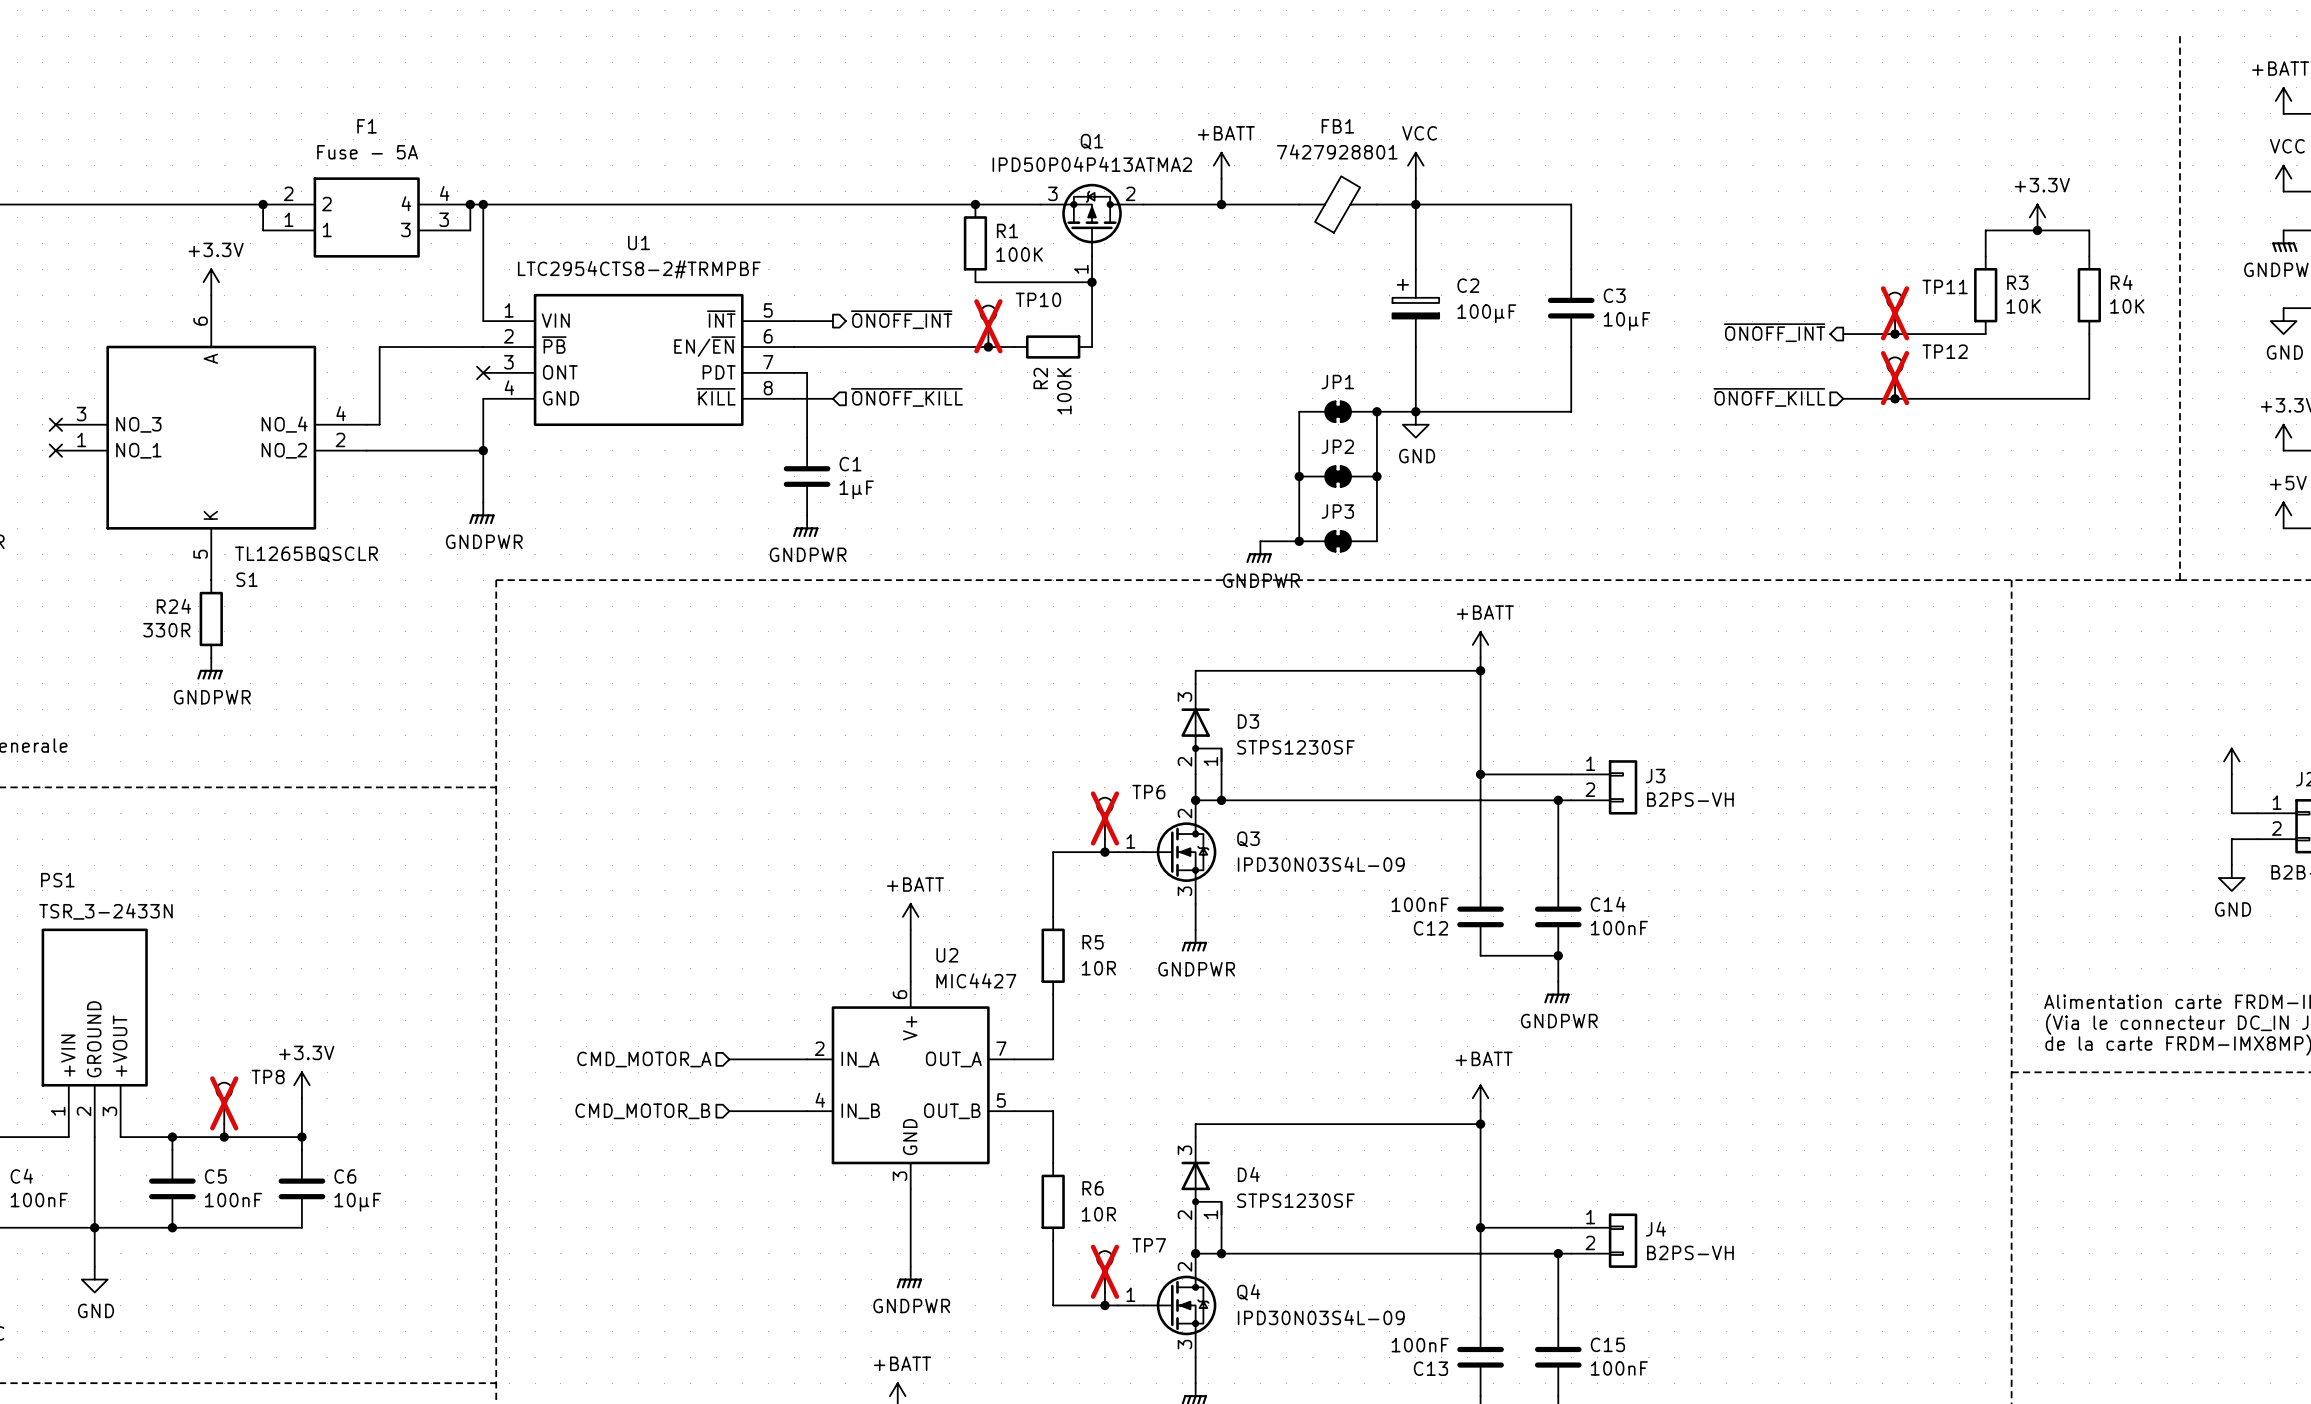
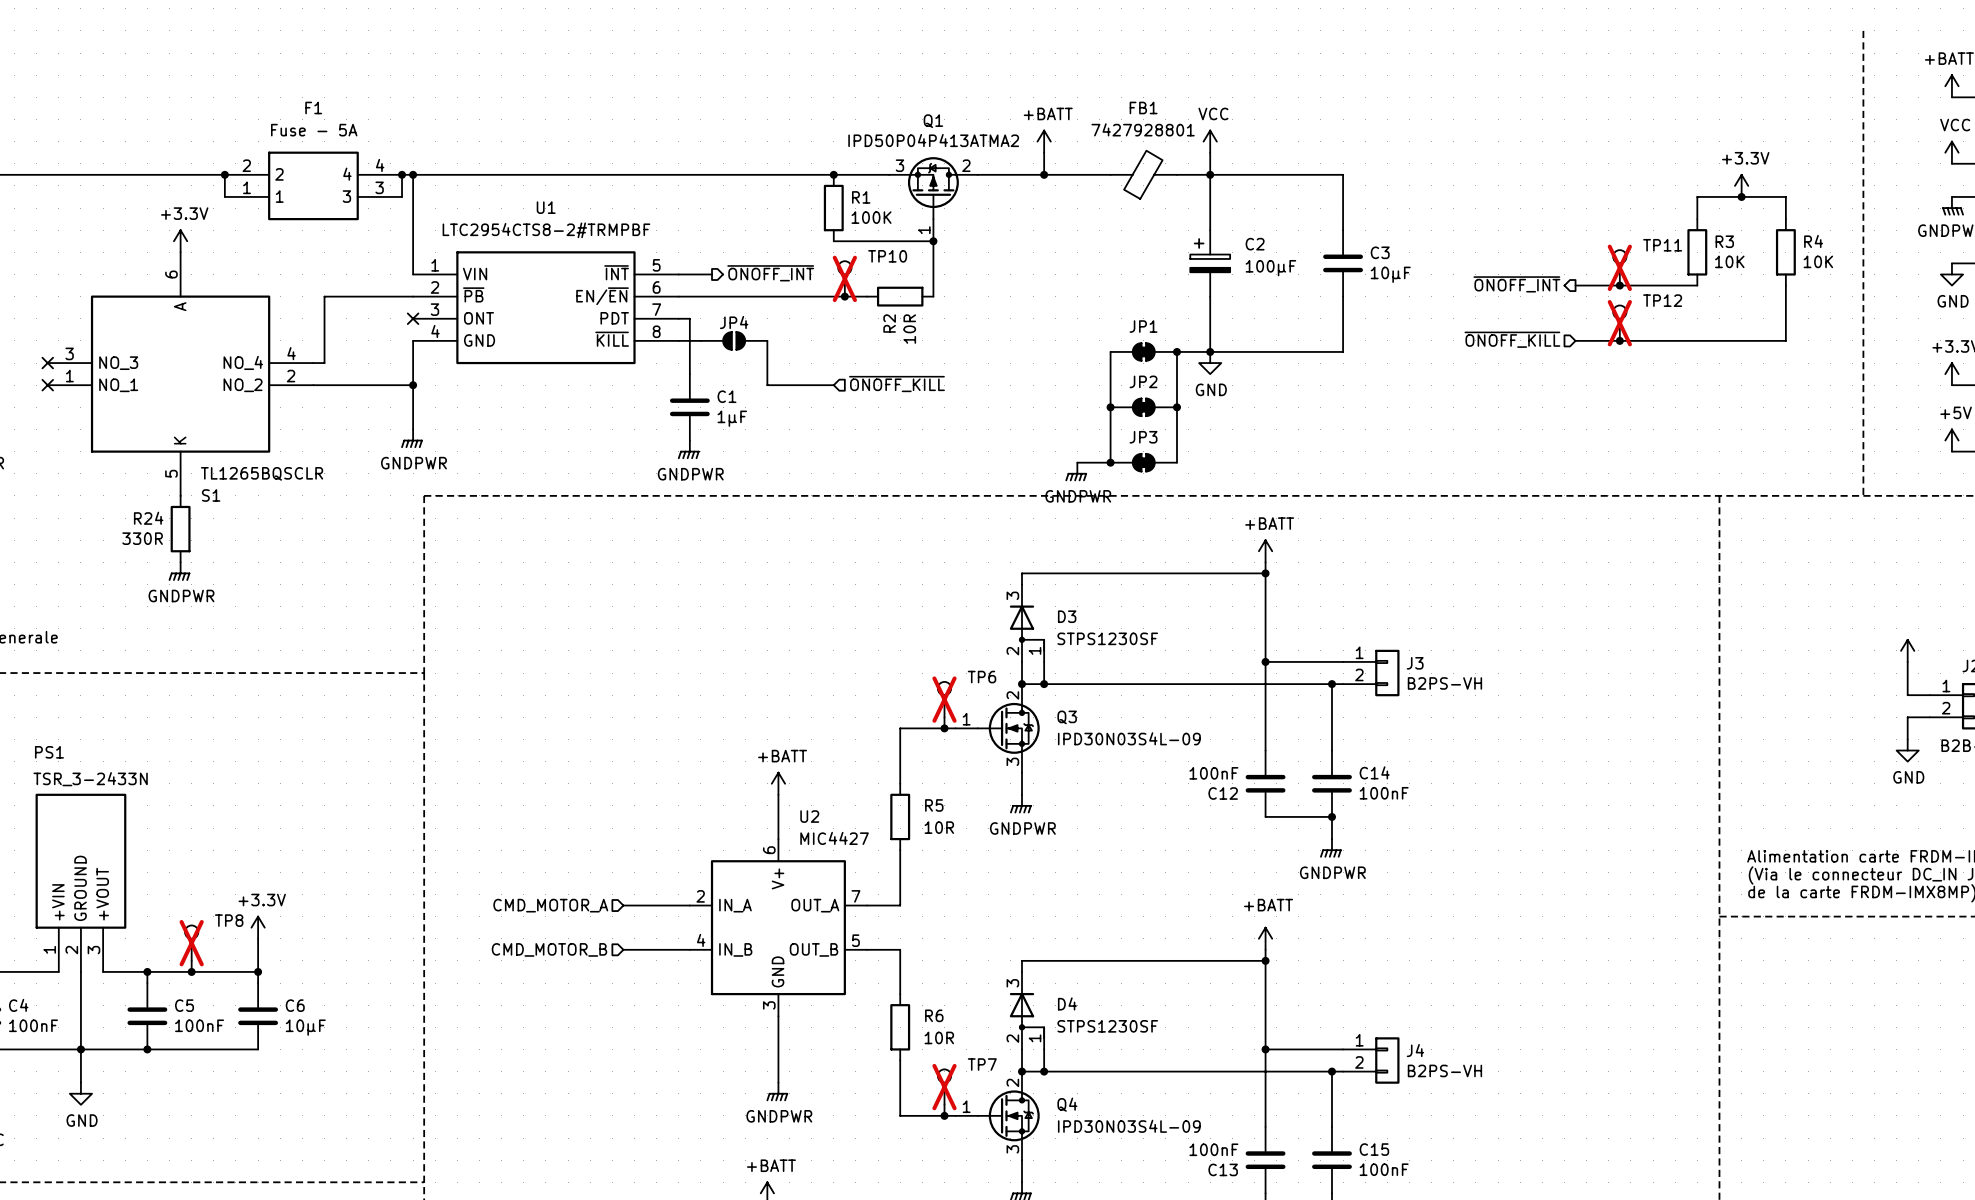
R2 value: 100K (1064, 391) -> 10R (909, 329)
hierarchical label position: ~{ONOFF_KILL} (906, 397) -> ~{ONOFF_KILL} (896, 384)
JP4: none -> (734, 340)
wire: none -> (767, 340) (767, 385) (833, 385)

